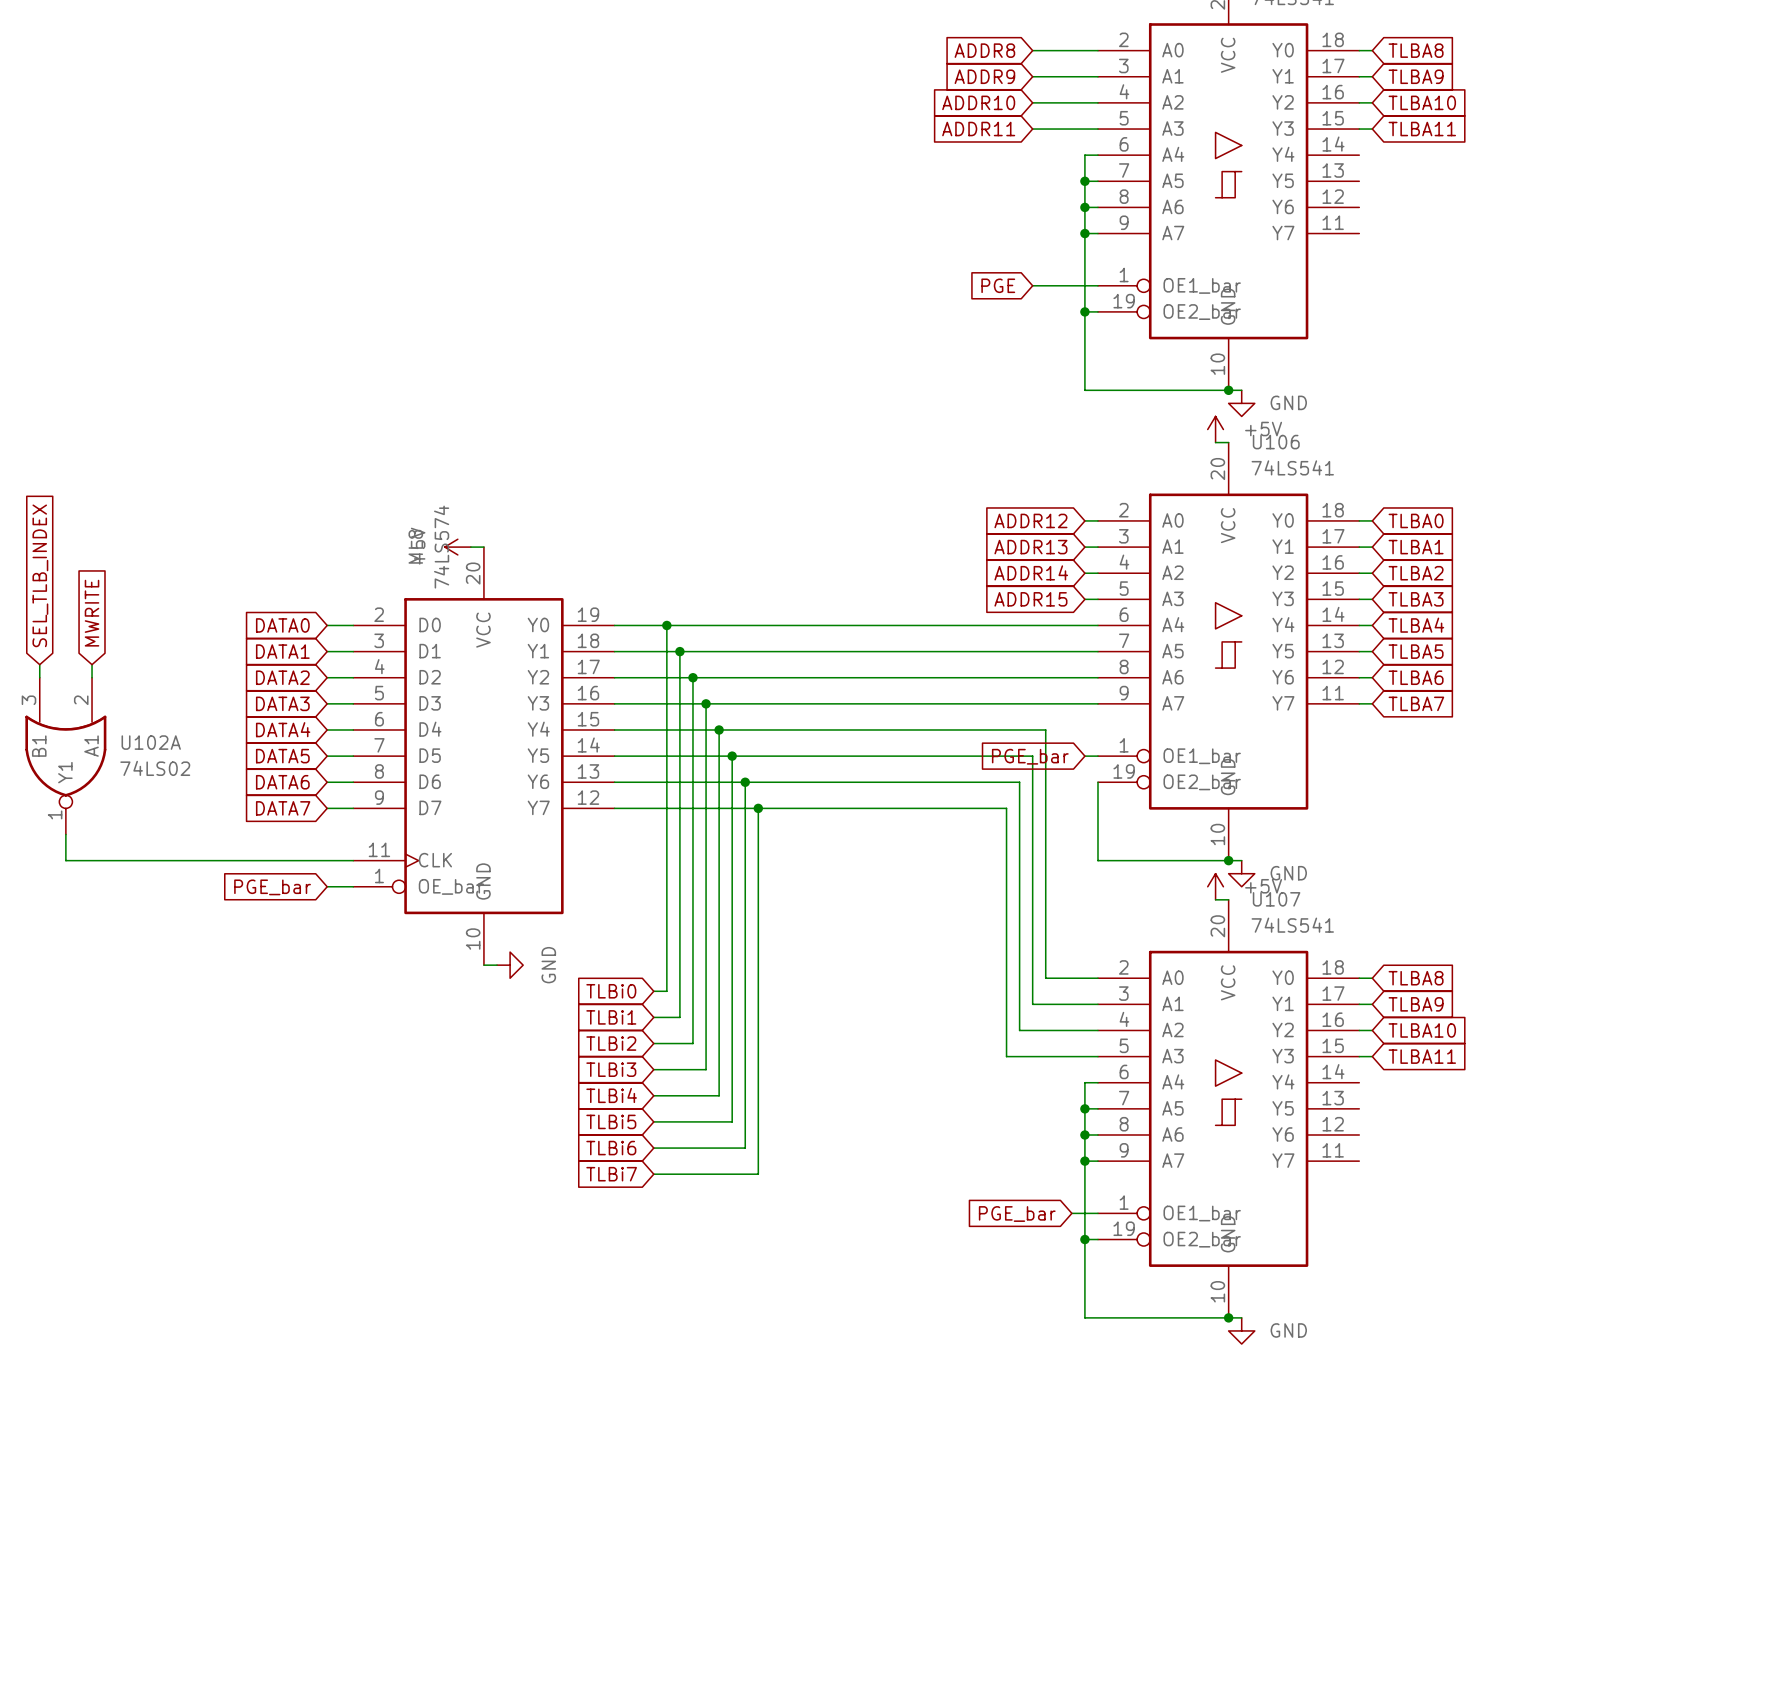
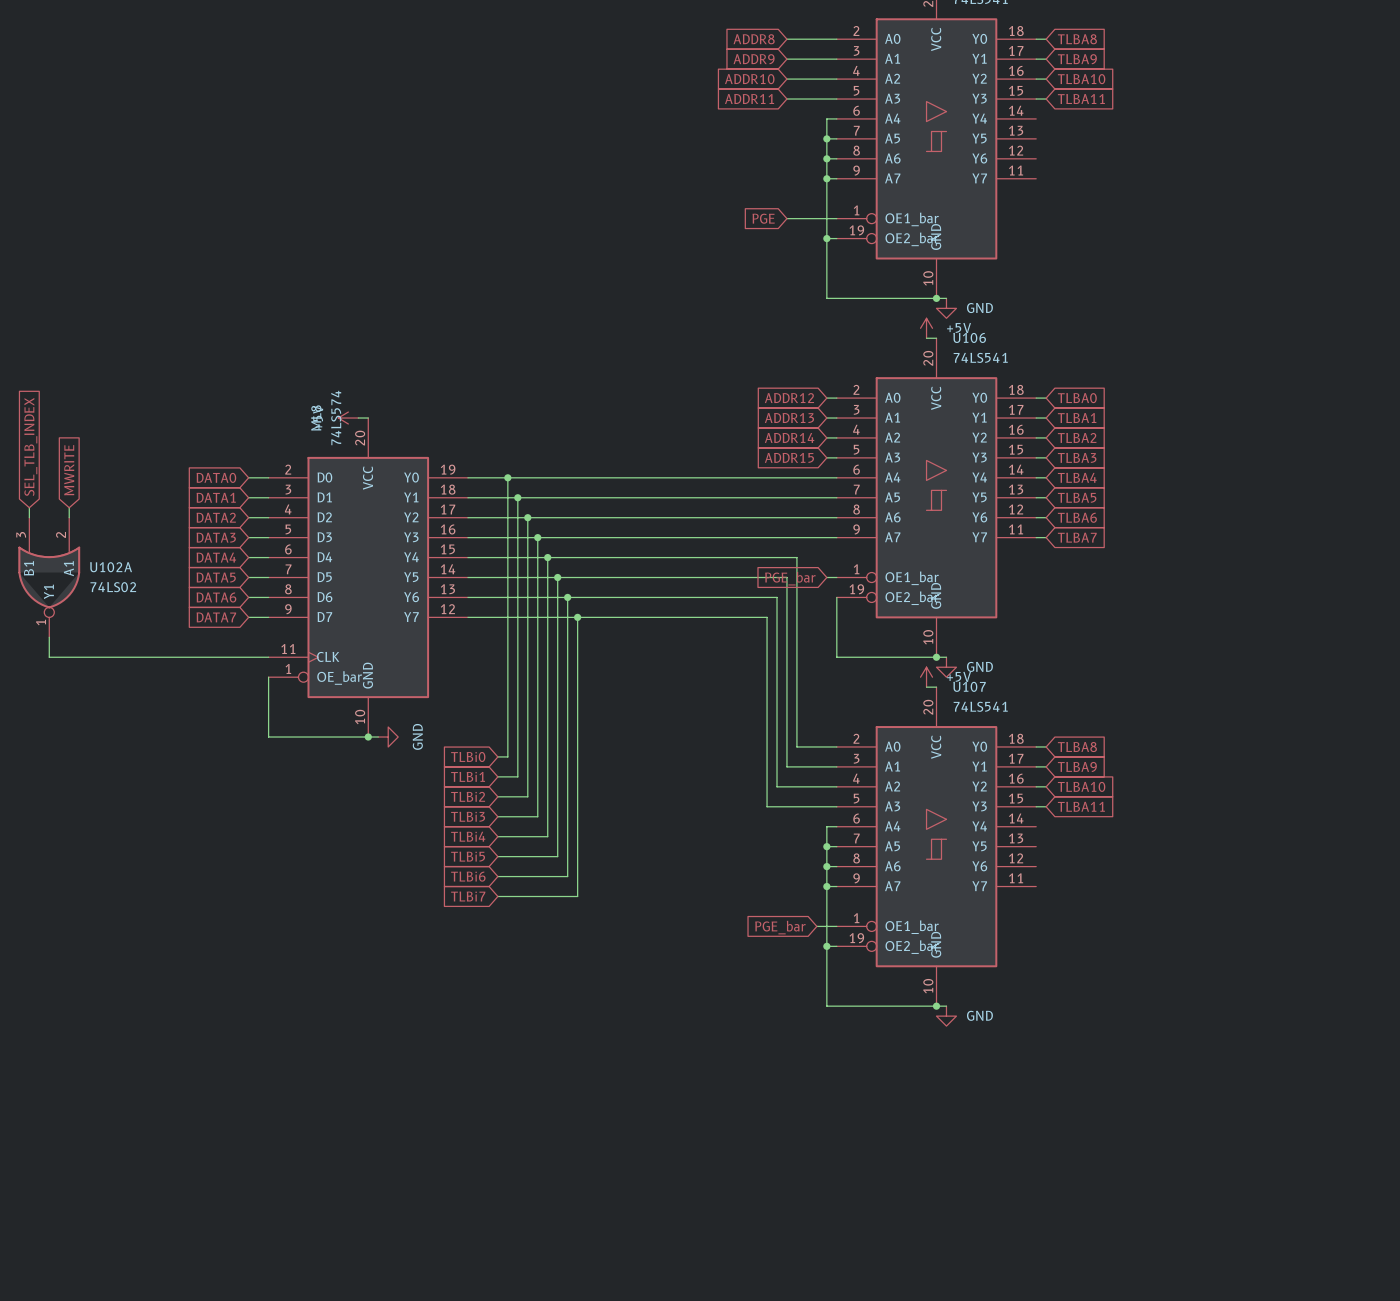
wire: (327, 886) (353, 886) -> (368, 737) (268, 737) (268, 677)
global label: PGE_bar (272, 887) -> none
junction: none -> (368, 737)

